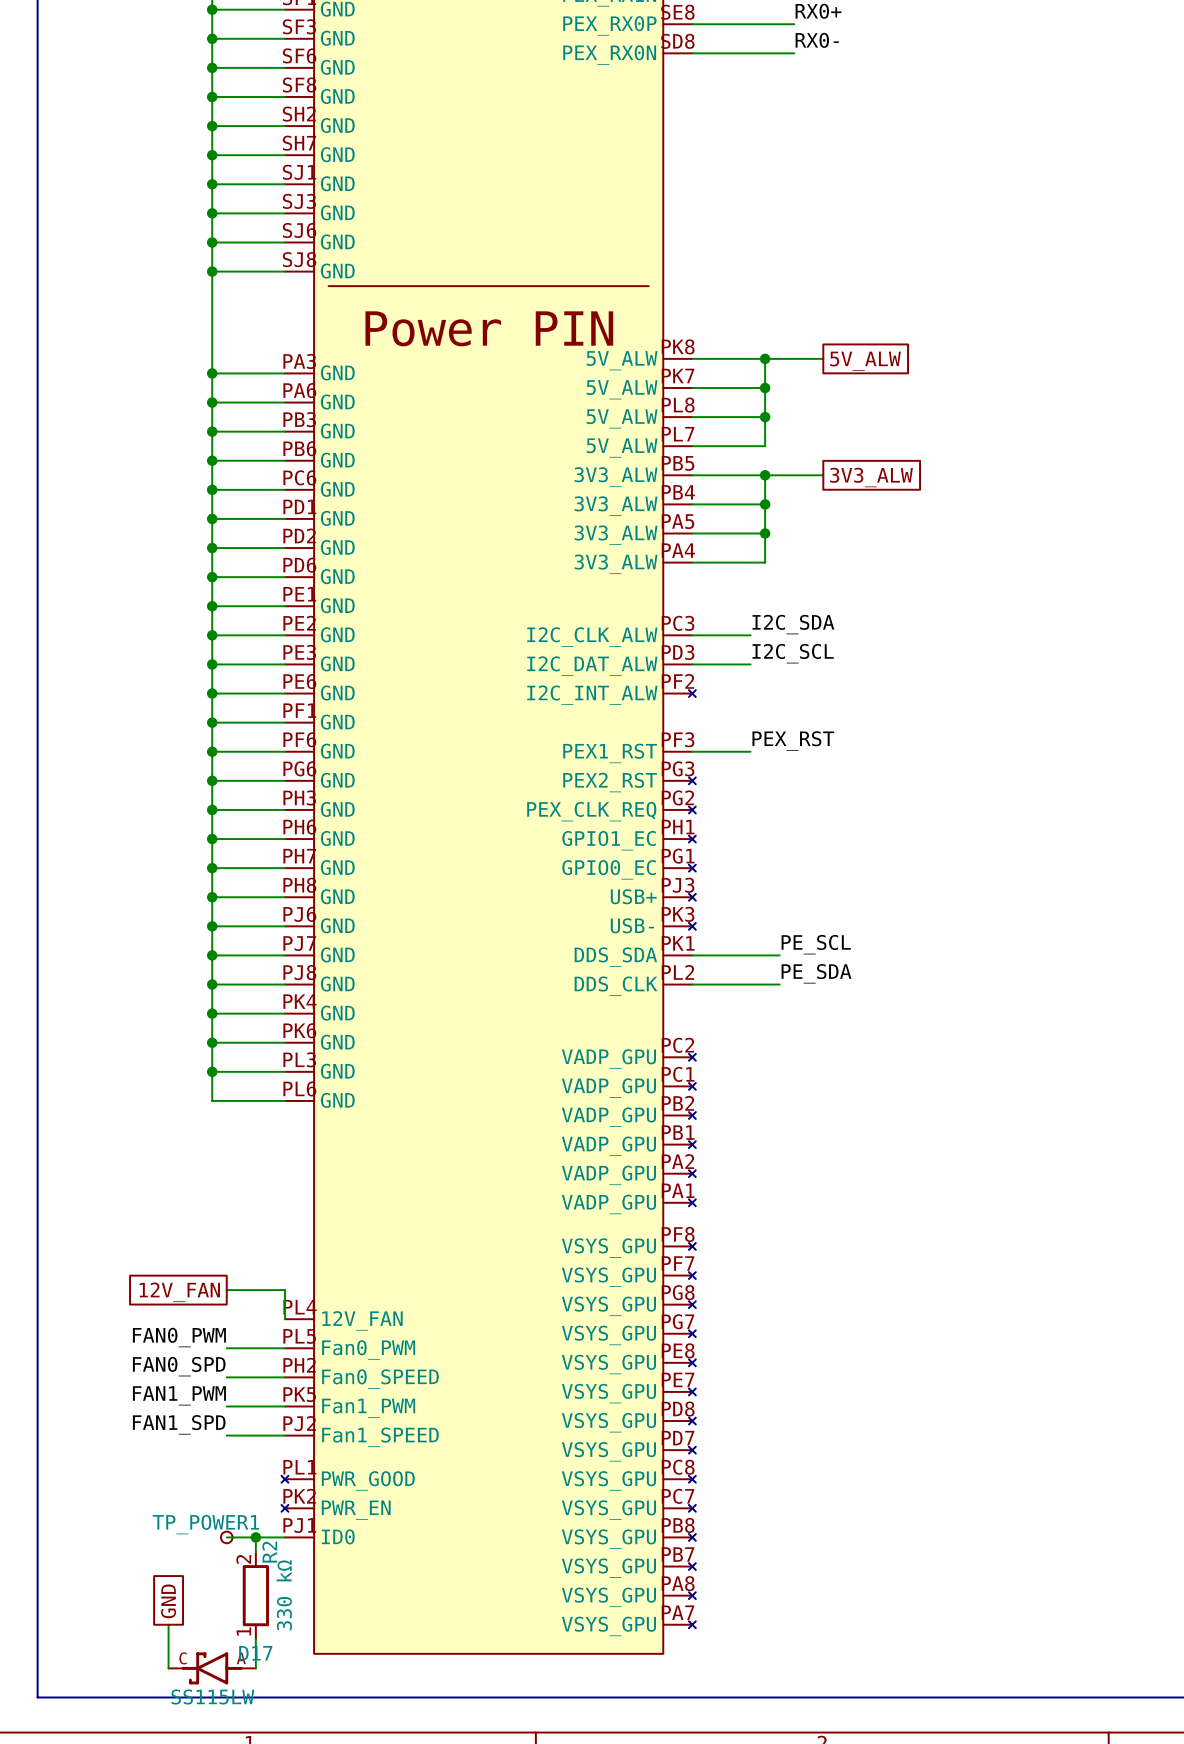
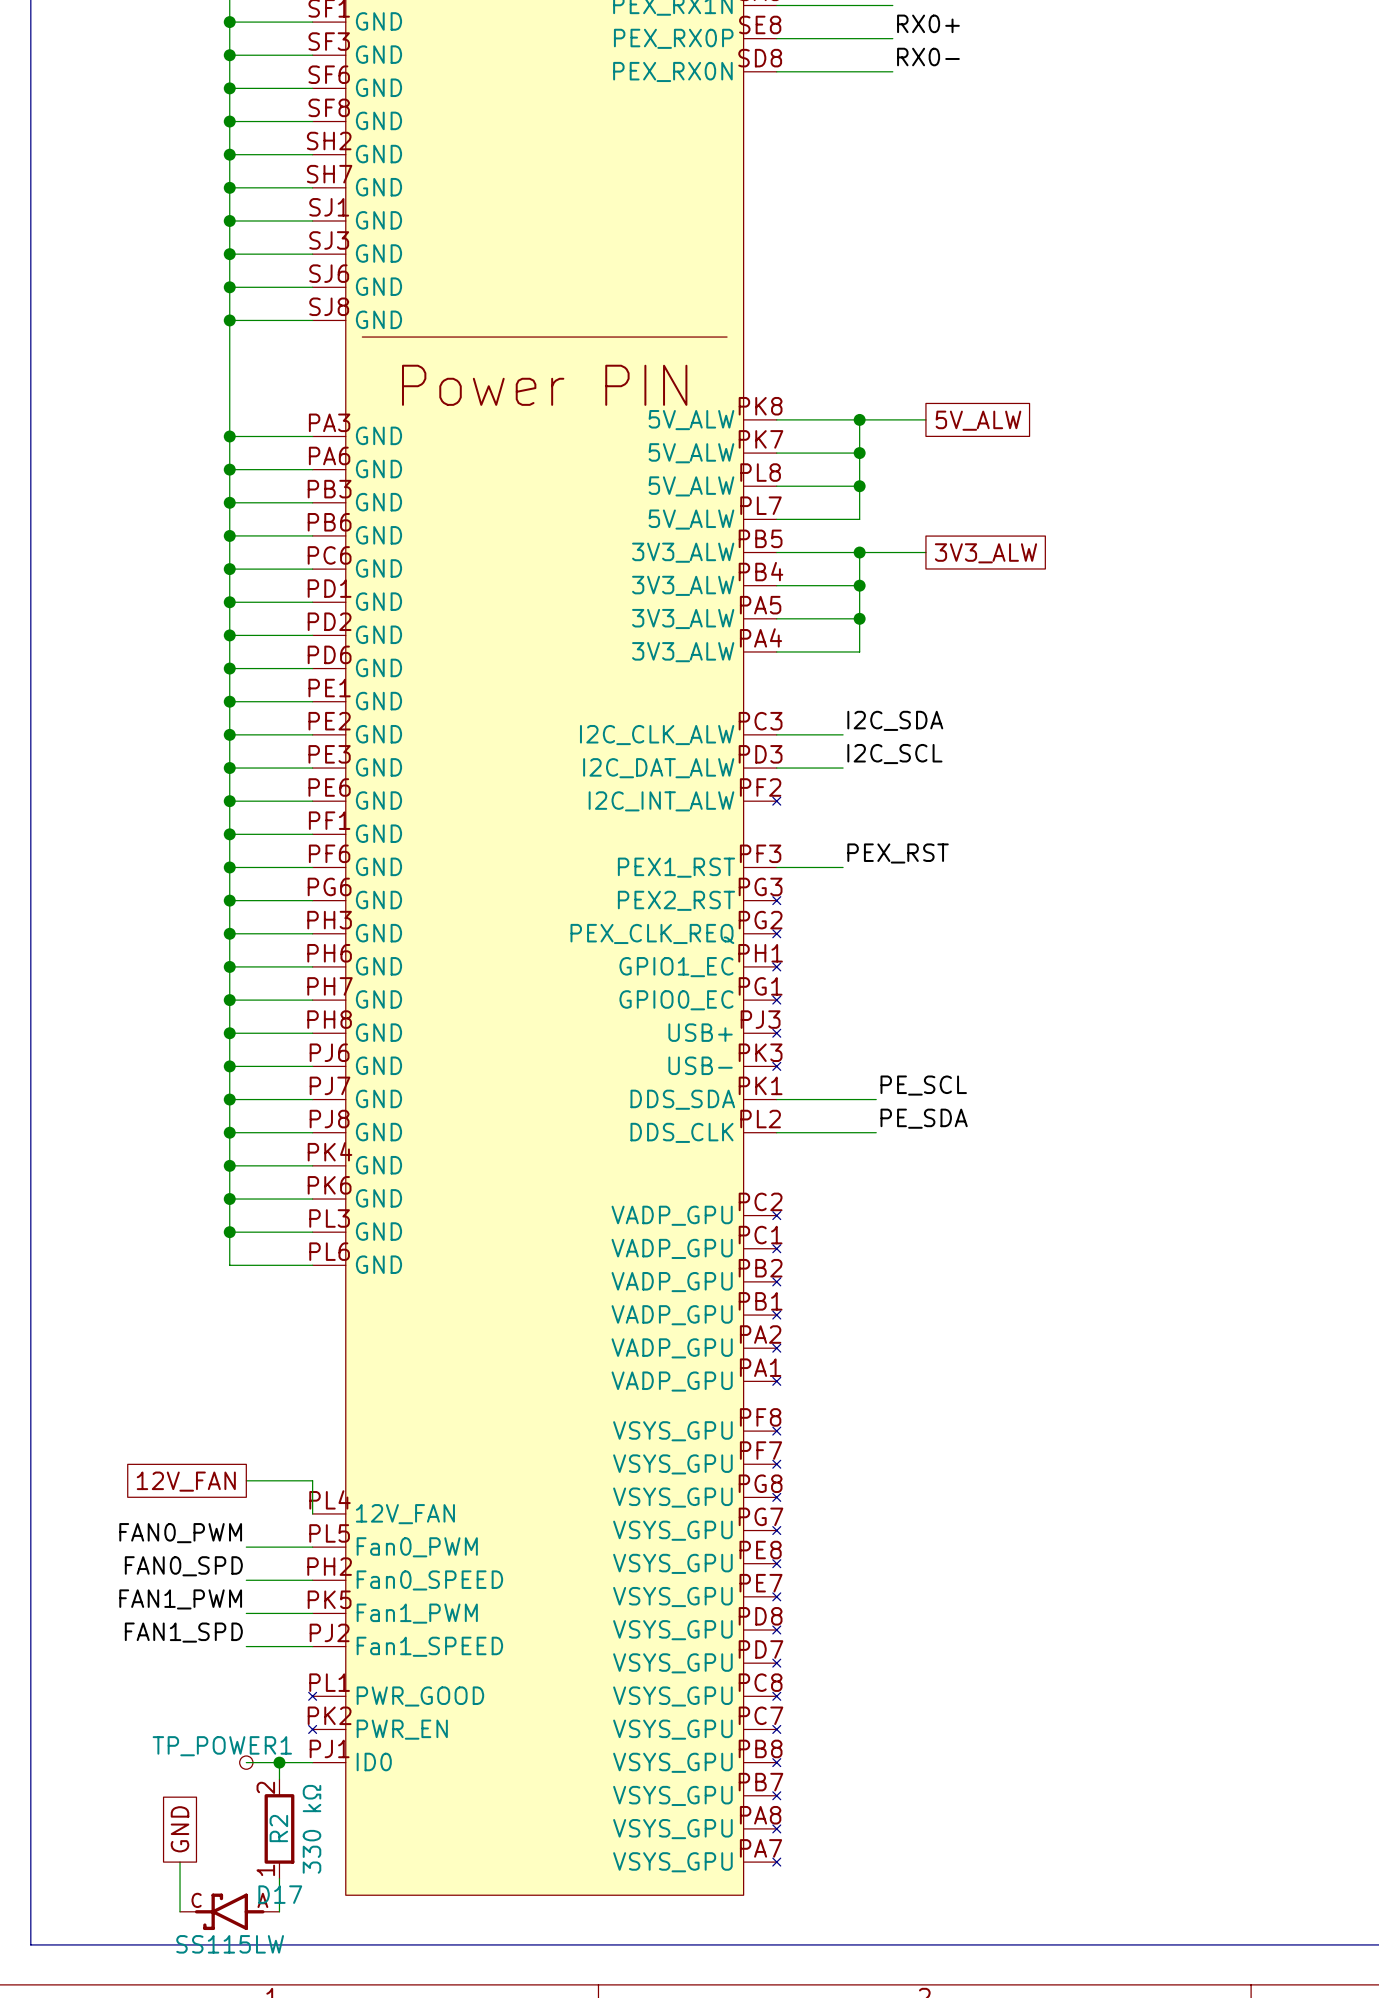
R2 name position: R2 (269, 1552) -> R2 (278, 1828)

